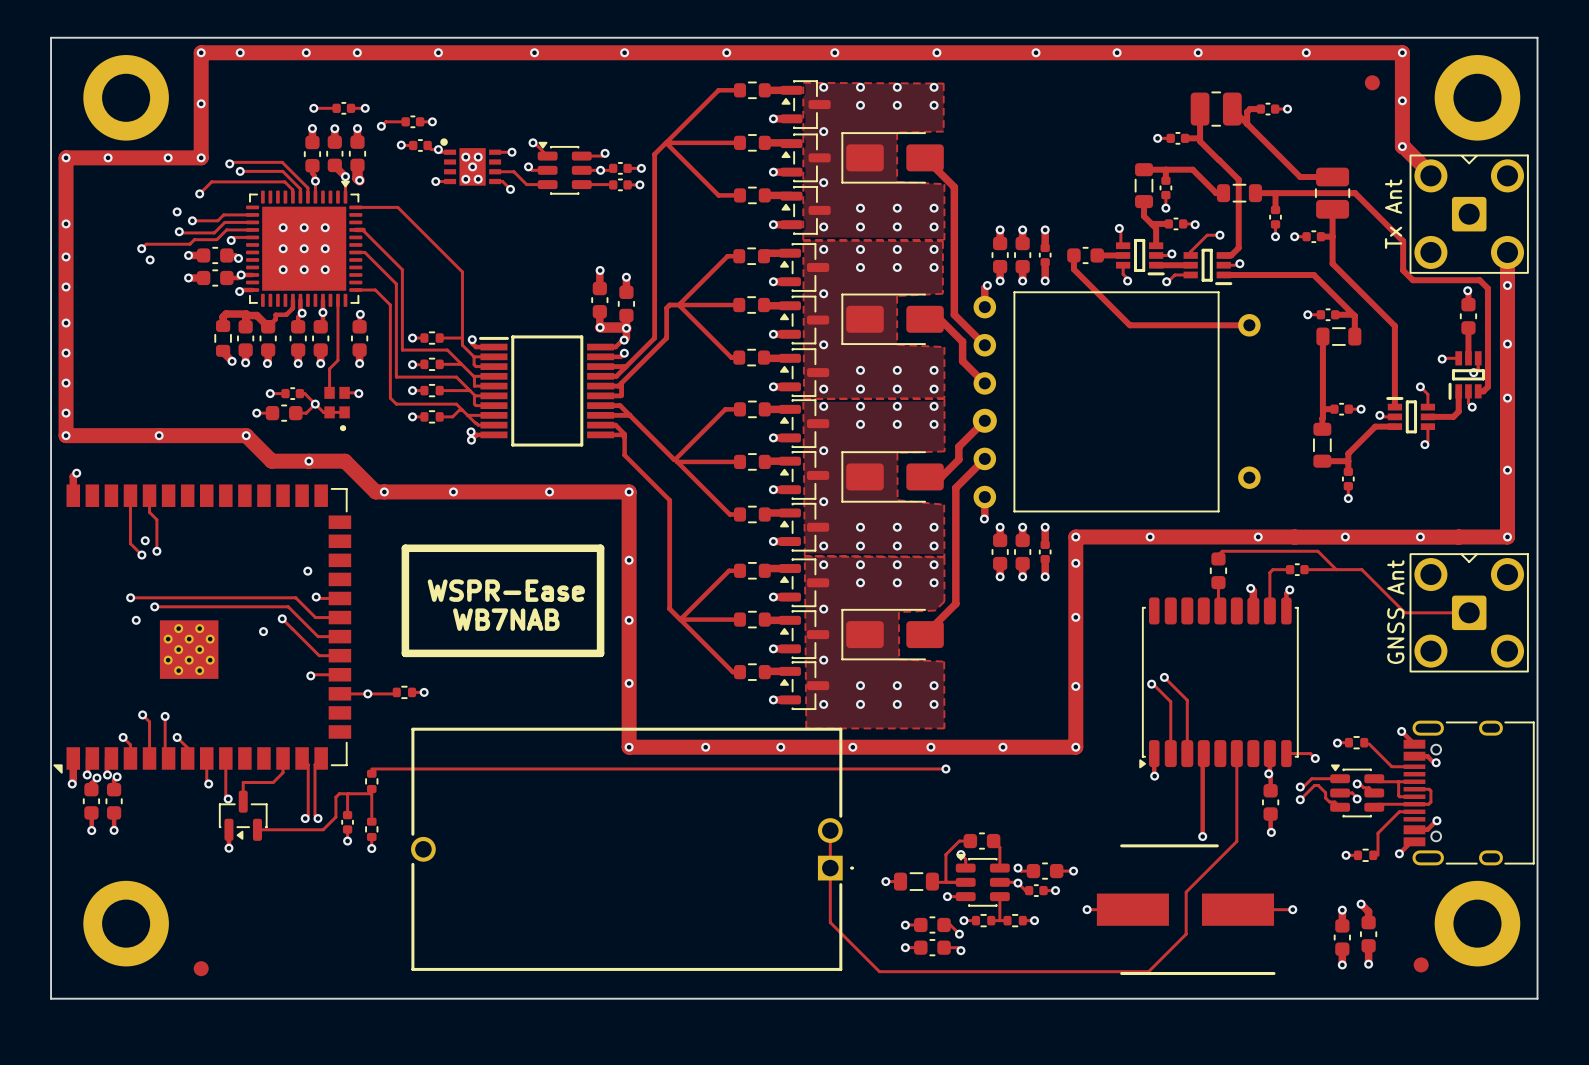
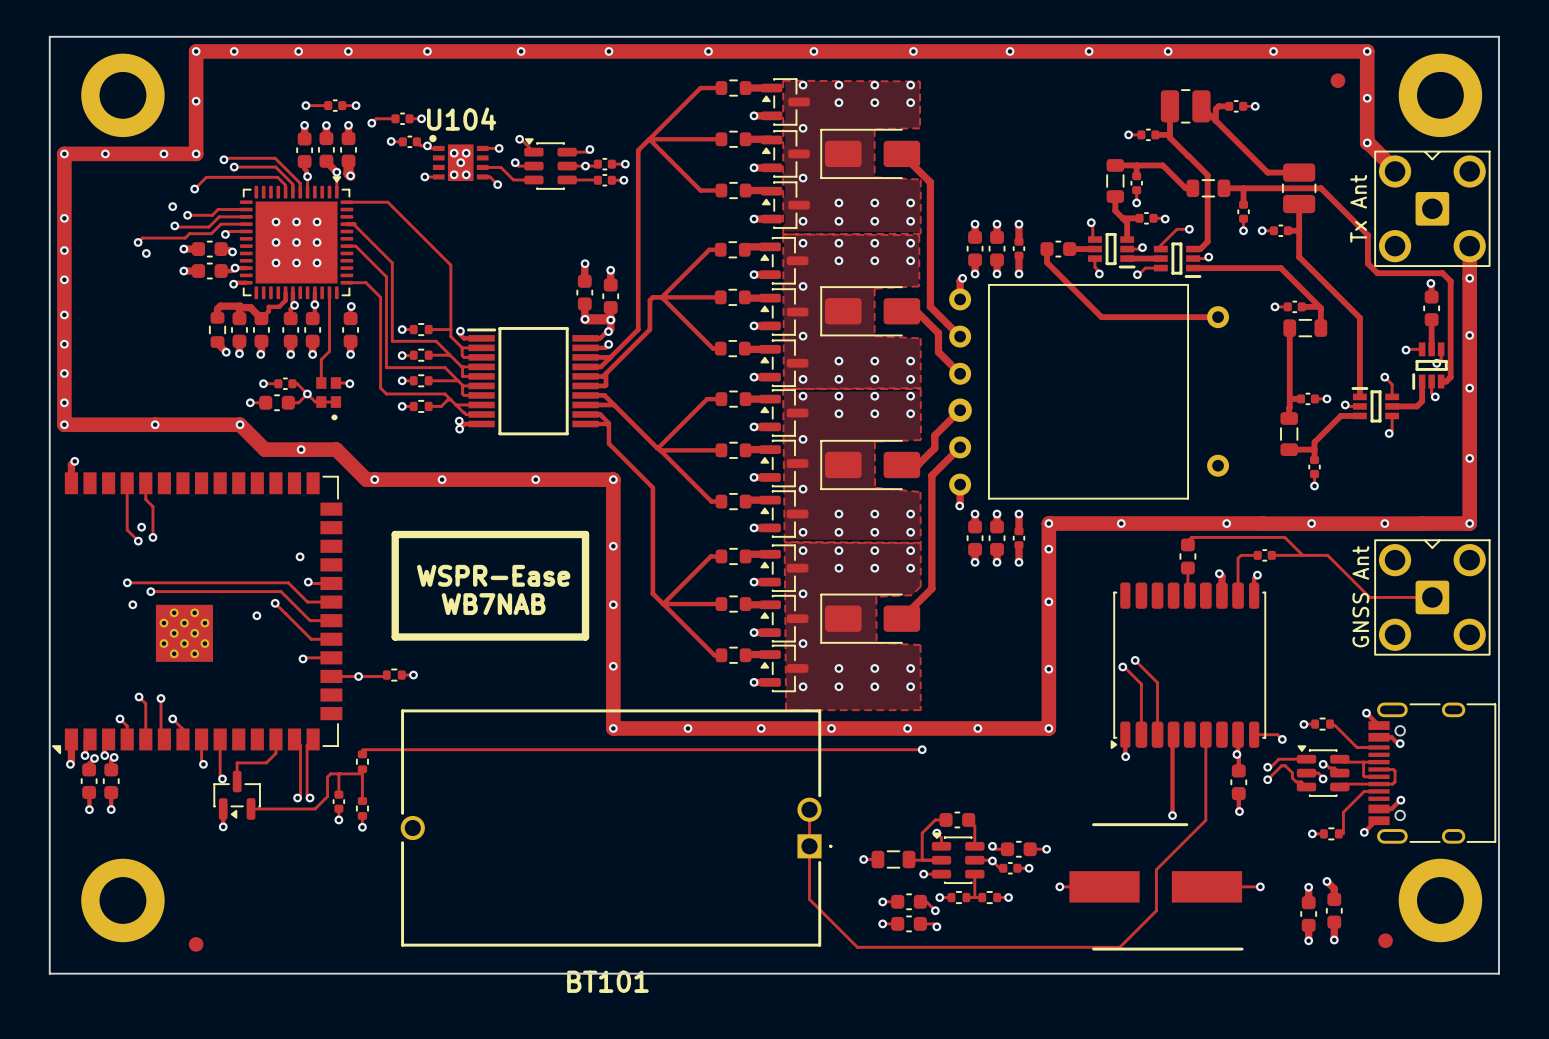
U104 name: none -> U104 (461, 119)
BT101 name: none -> BT101 (607, 981)

